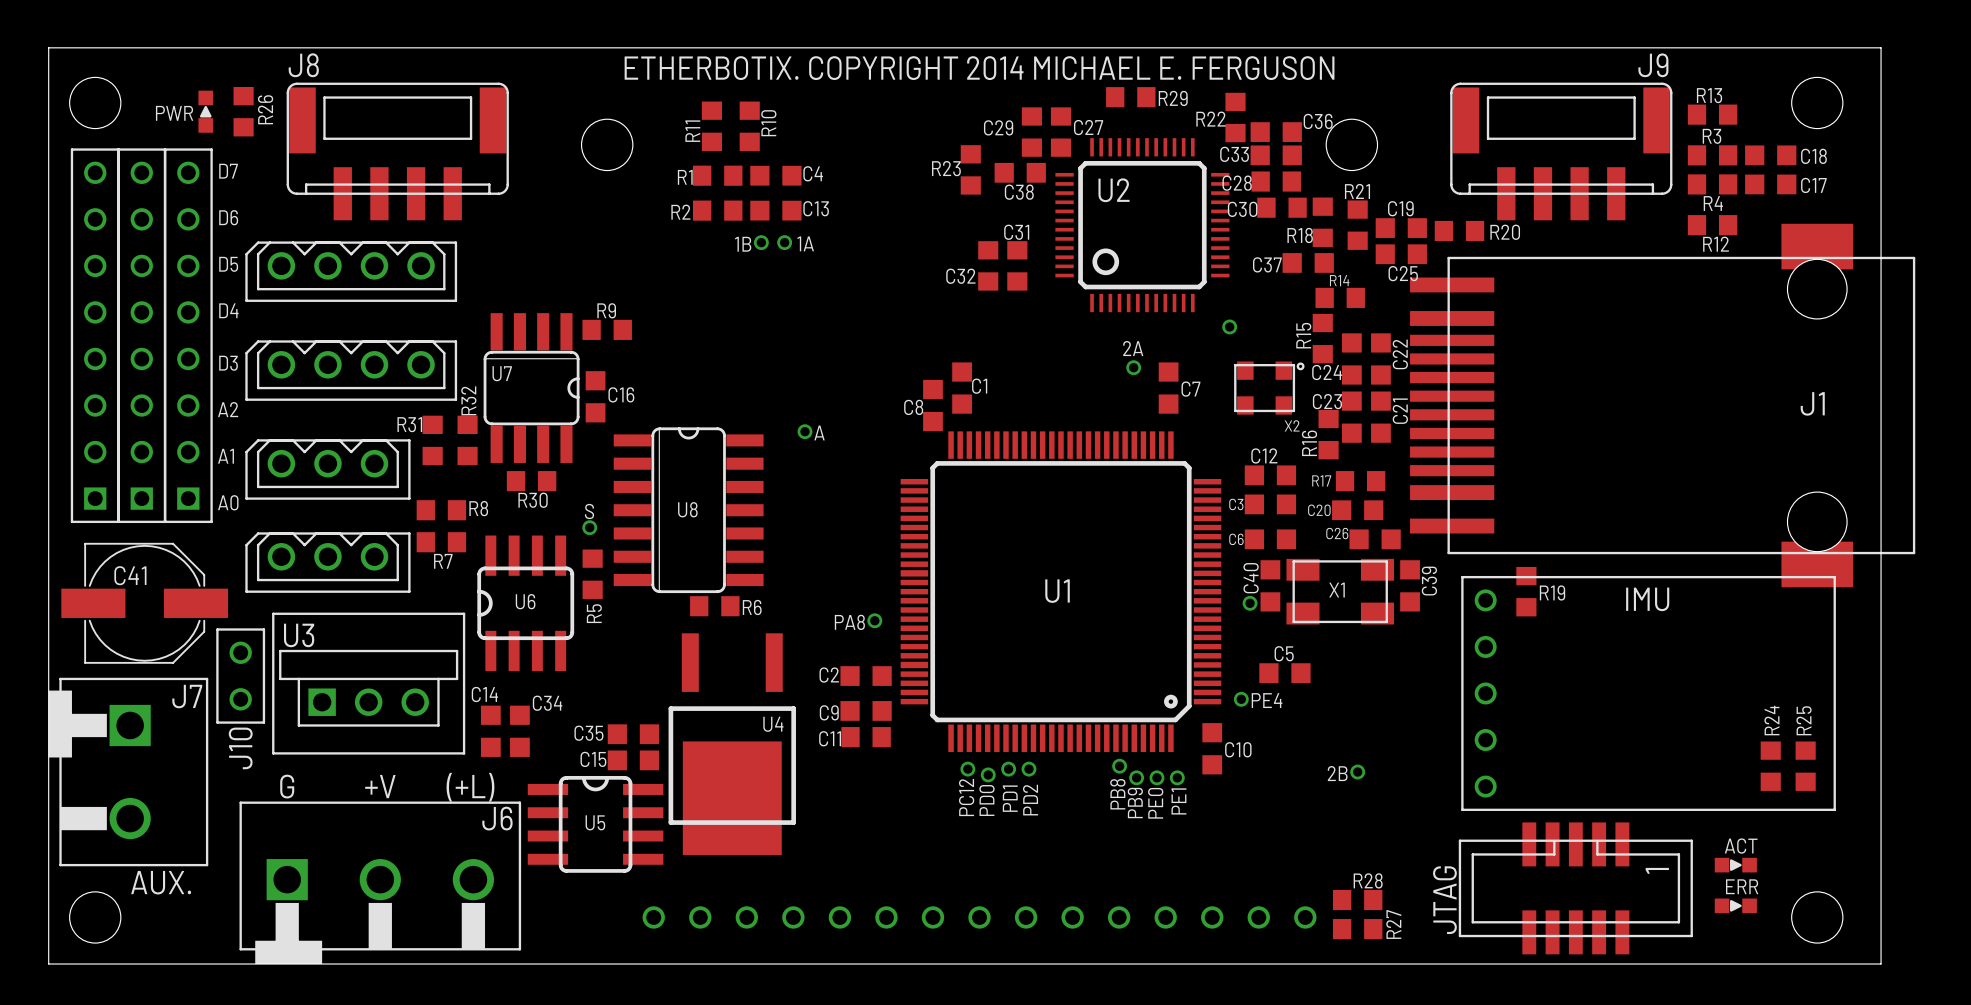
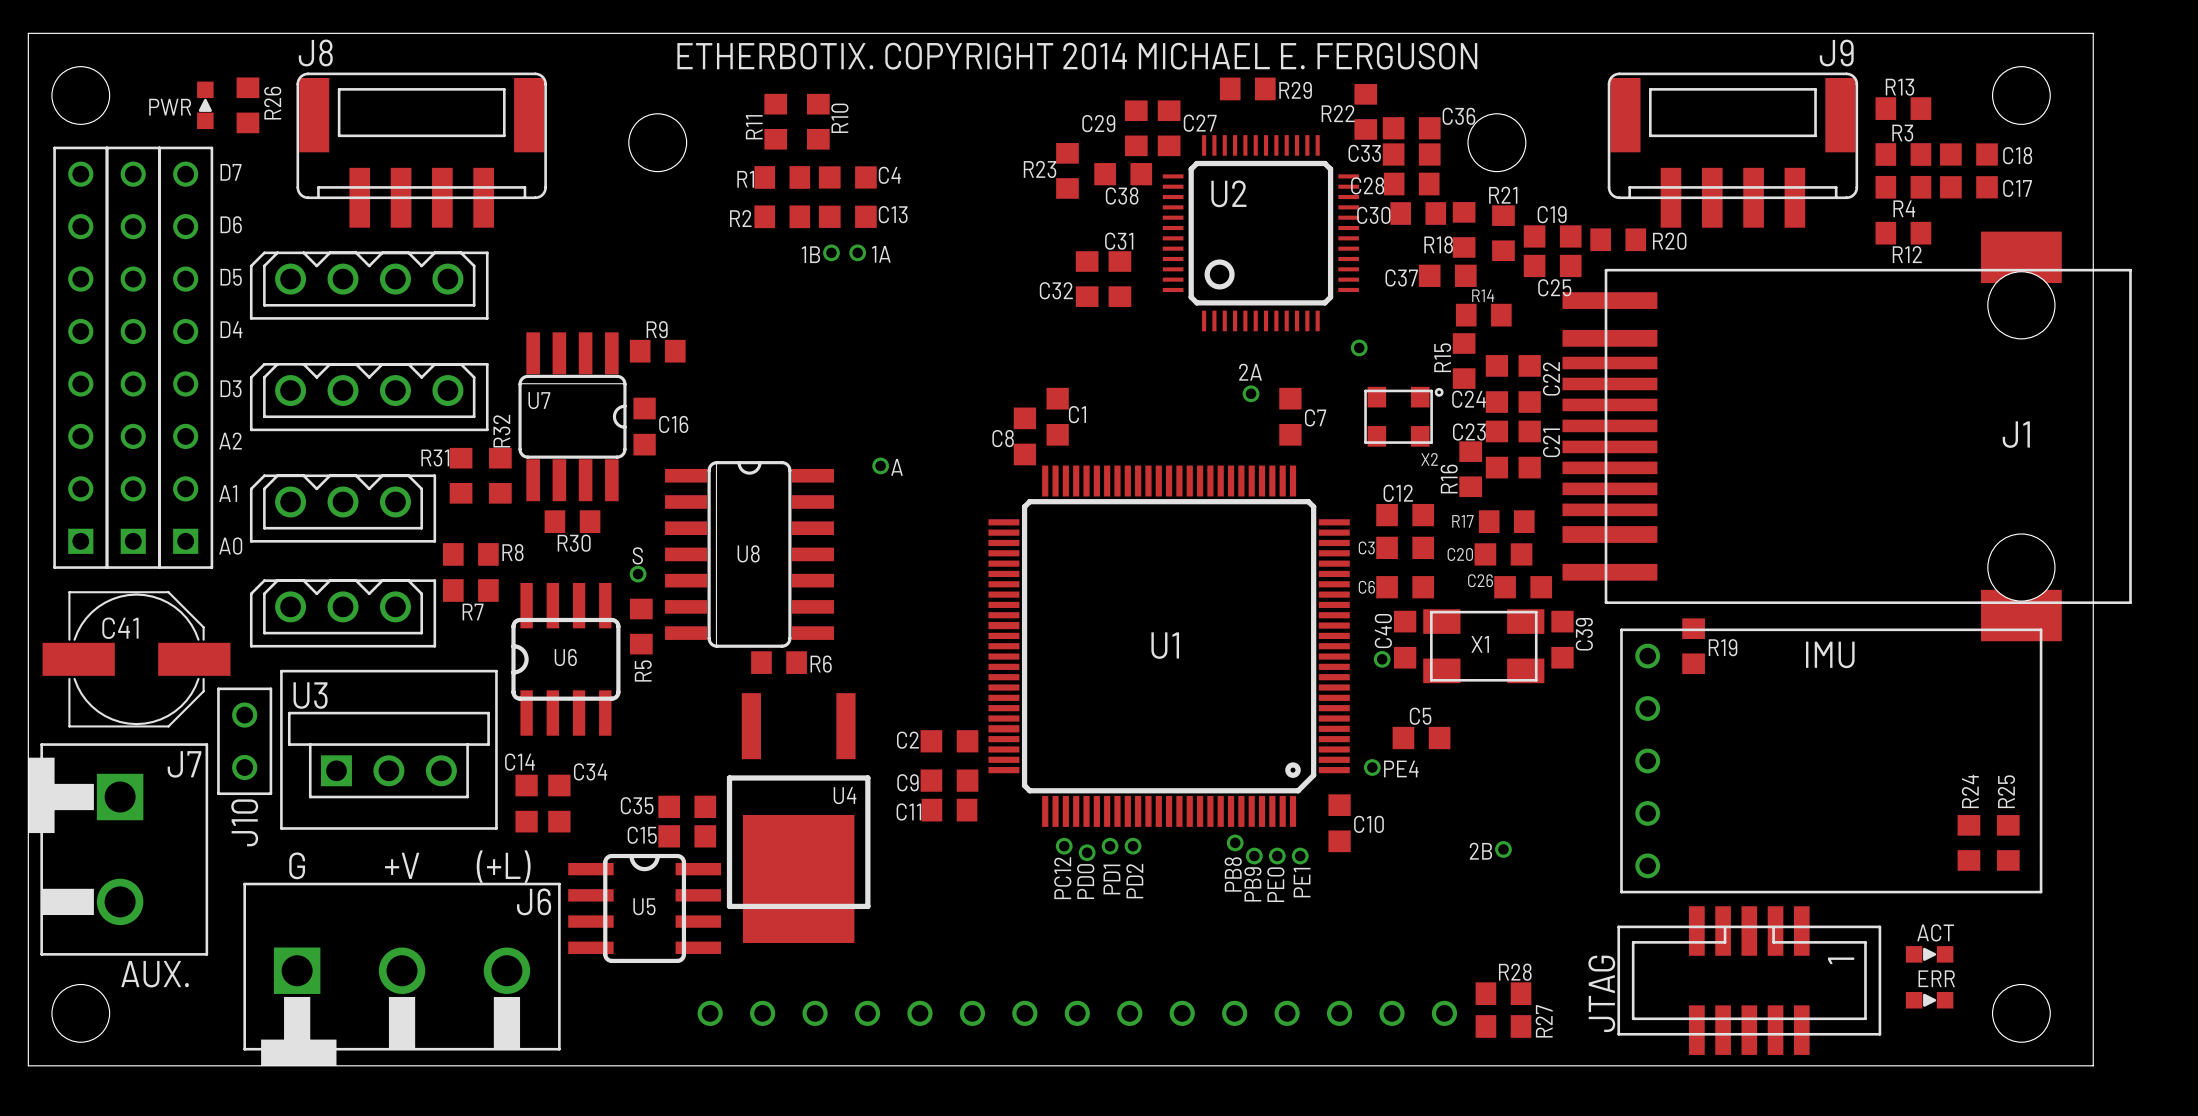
part: (874, 620) -> none
text: PA8 (849, 622) -> none

